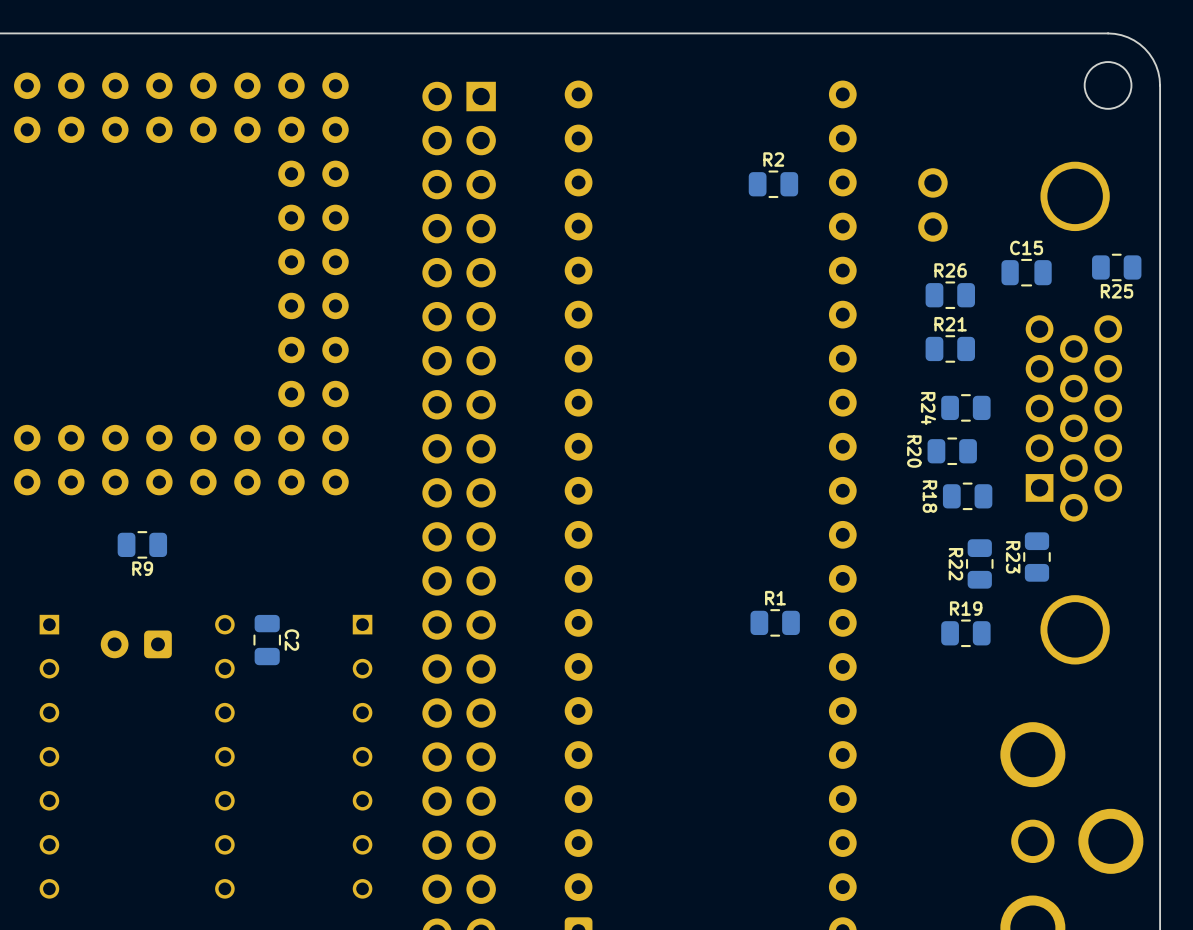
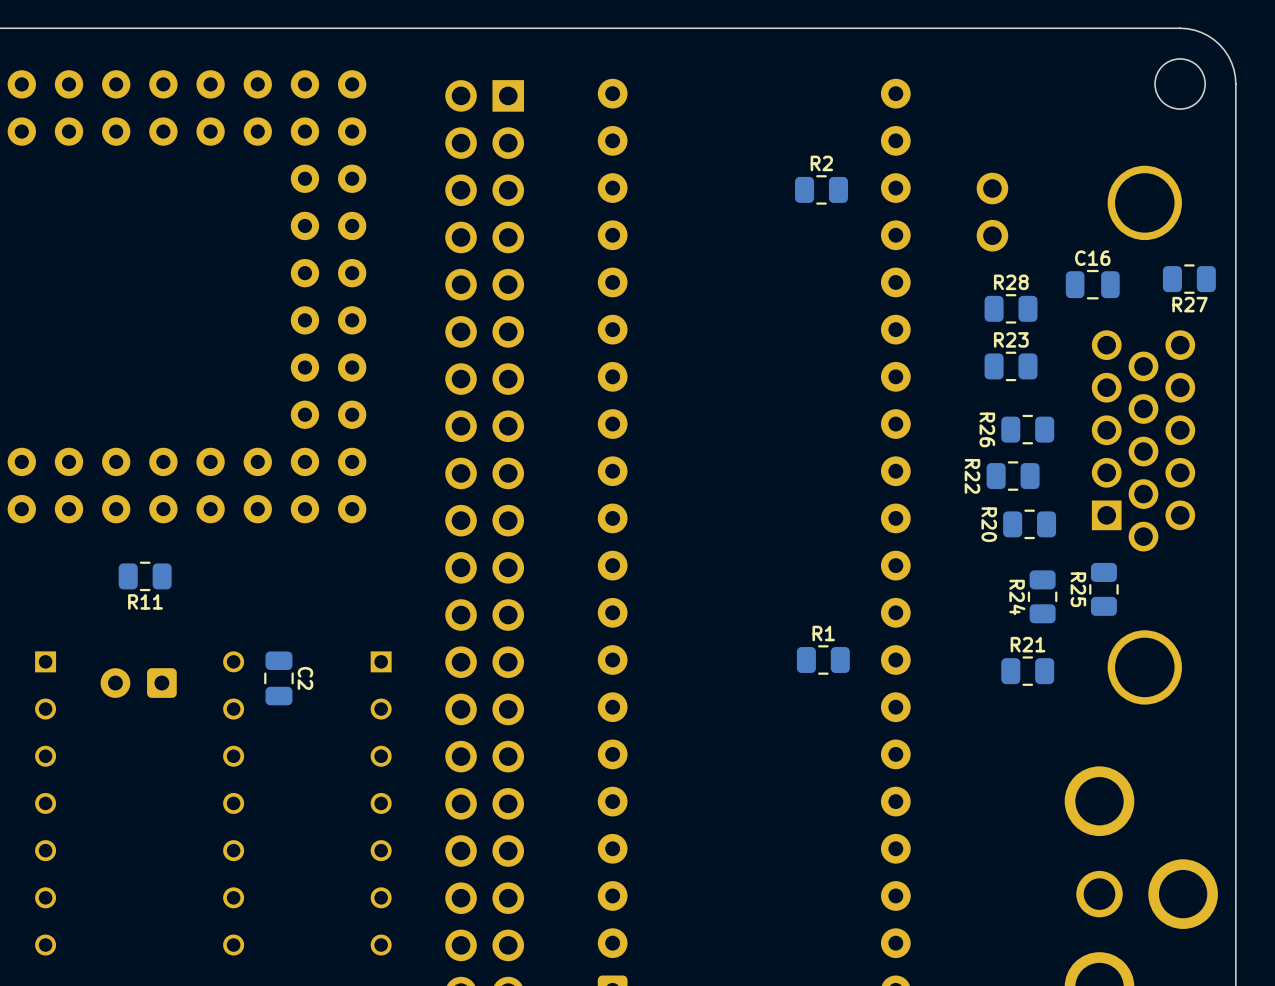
C15 name: C15 (1026, 247) -> C16 (1092, 258)
R26 name: R26 (950, 270) -> R28 (1011, 282)
R25 name: R25 (1117, 291) -> R27 (1190, 304)
R21 name: R21 (950, 324) -> R23 (1011, 339)
R24 name: R24 (928, 408) -> R26 (987, 429)
R20 name: R20 (914, 451) -> R22 (972, 476)
R18 name: R18 (929, 496) -> R20 (989, 524)
R23 name: R23 (1013, 557) -> R25 (1078, 589)
R22 name: R22 (955, 564) -> R24 (1017, 597)
R9 name: R9 (142, 568) -> R11 (145, 601)
R19 name: R19 (966, 608) -> R21 (1028, 644)

